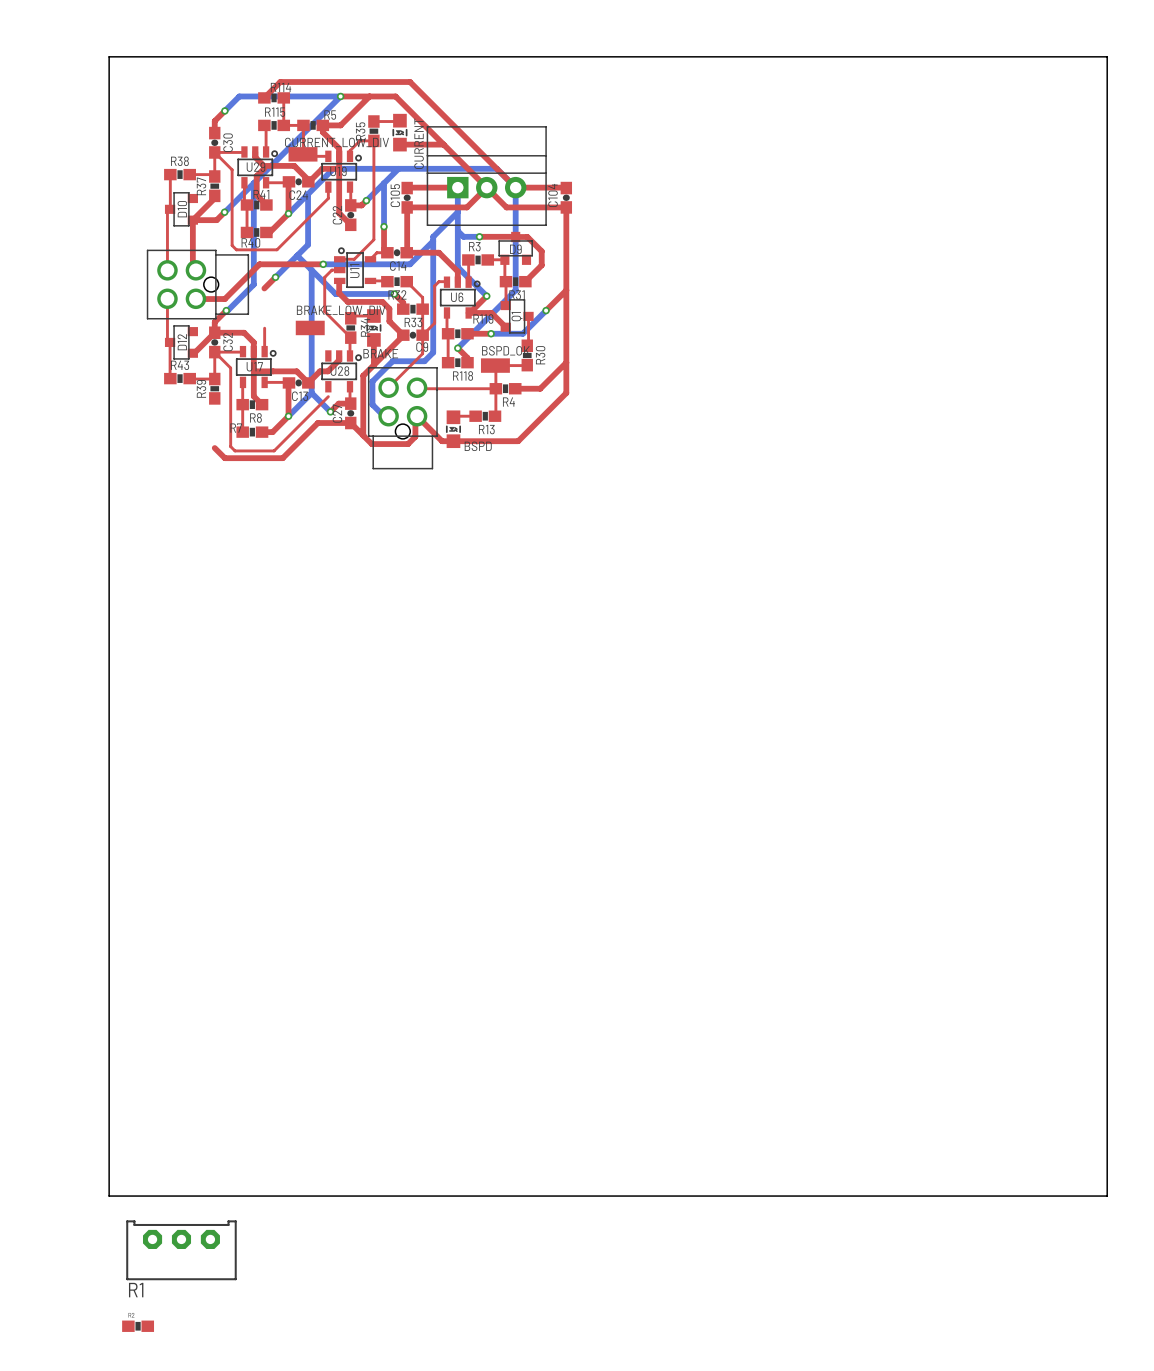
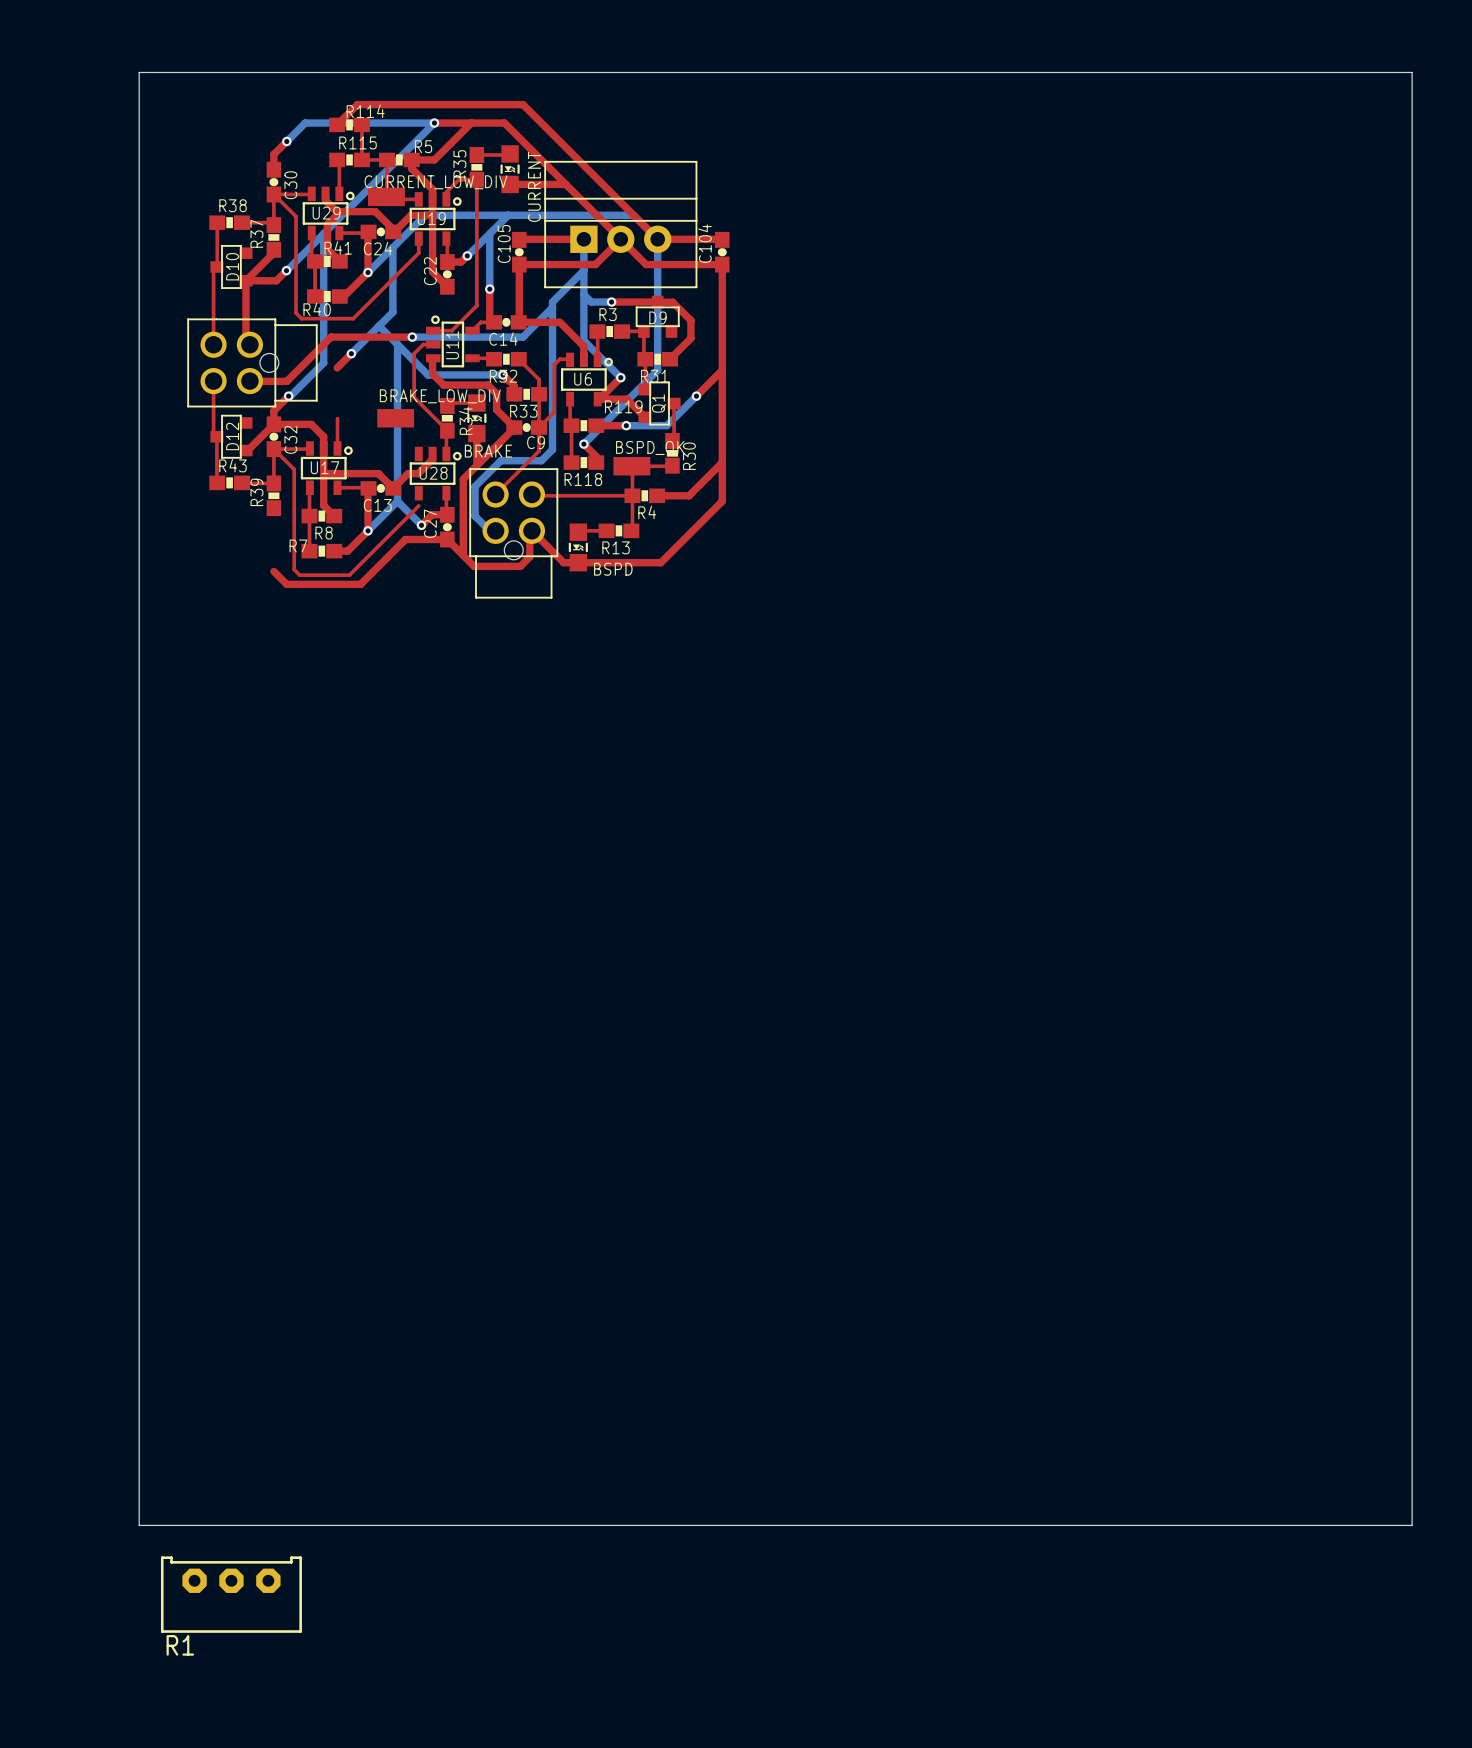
part: (138, 1326) -> none

